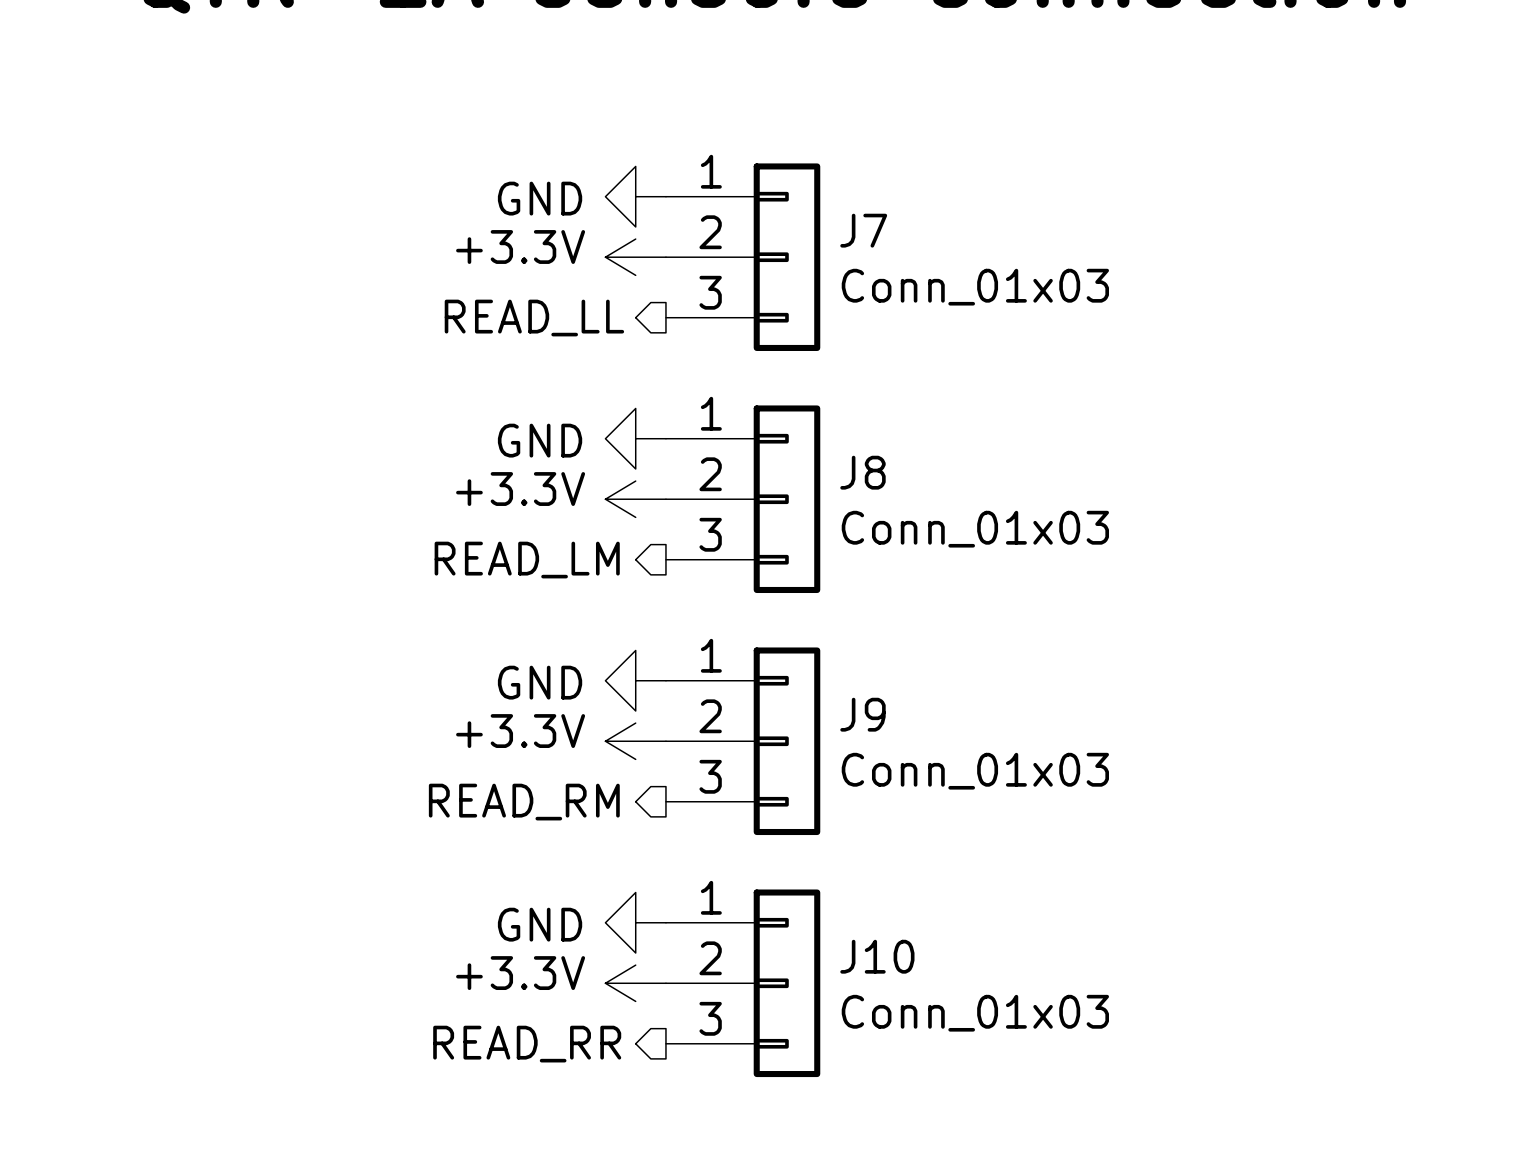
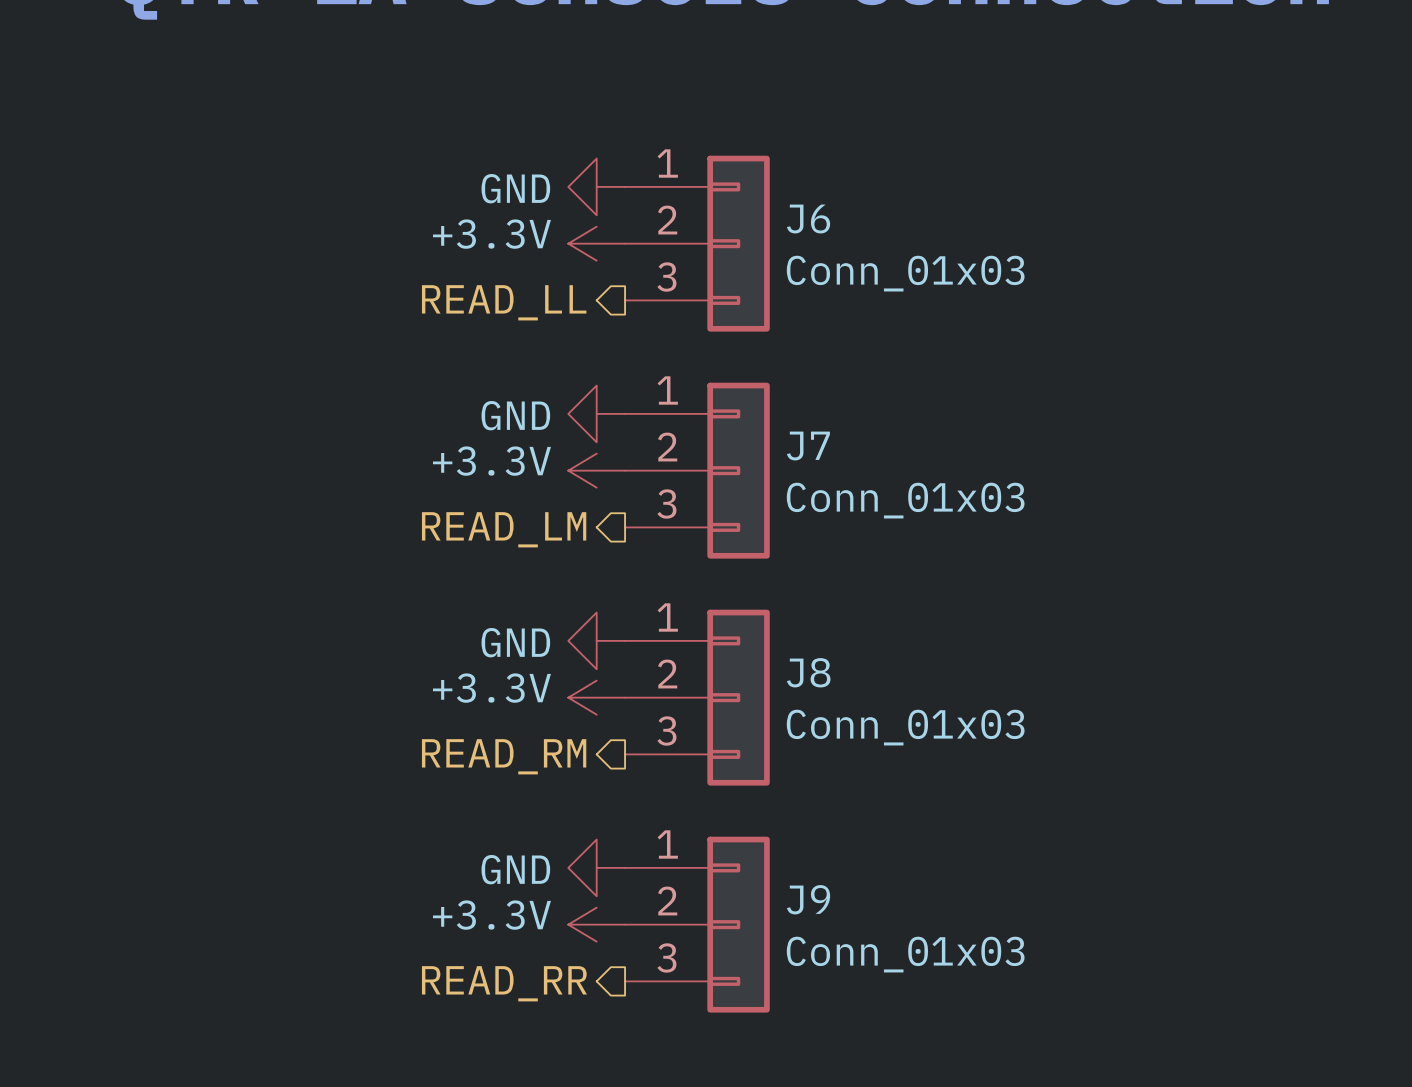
J7 name: J7 (863, 230) -> J6 (808, 219)
J8 name: J8 (862, 472) -> J7 (808, 446)
J9 name: J9 (862, 714) -> J8 (808, 672)
J10 name: J10 (877, 956) -> J9 (808, 899)

